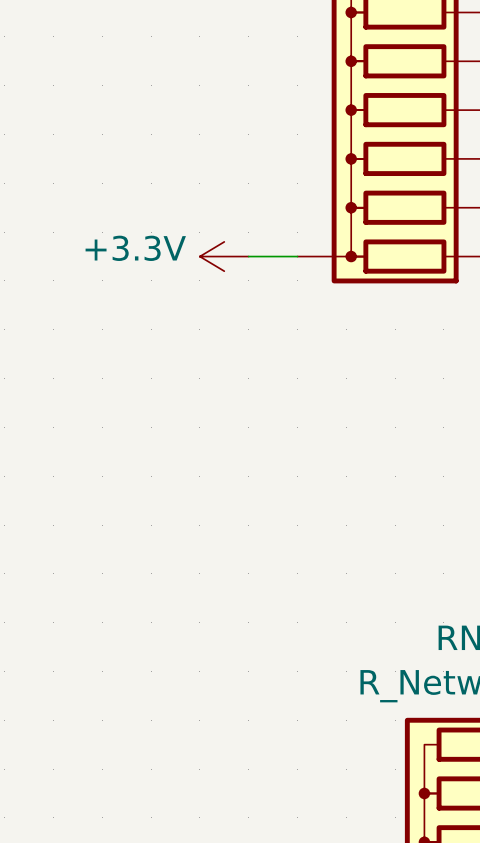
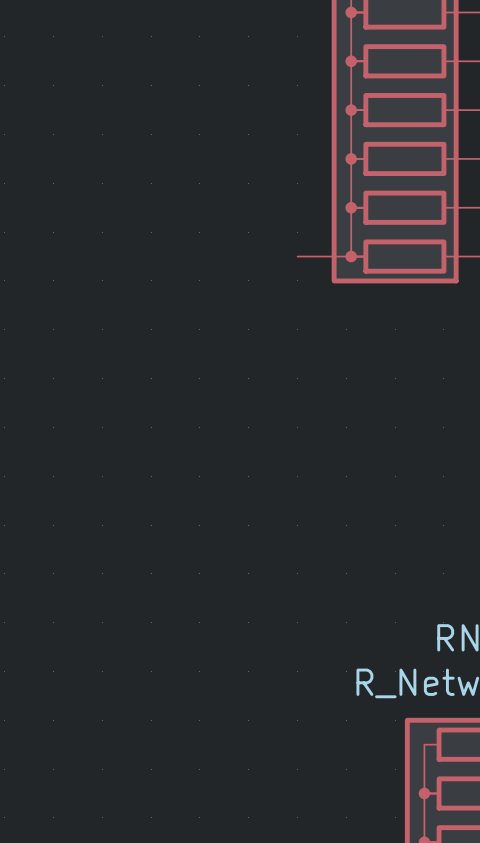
power symbol: +3.3V (224, 256) -> none
wire: (248, 256) (297, 256) -> none

